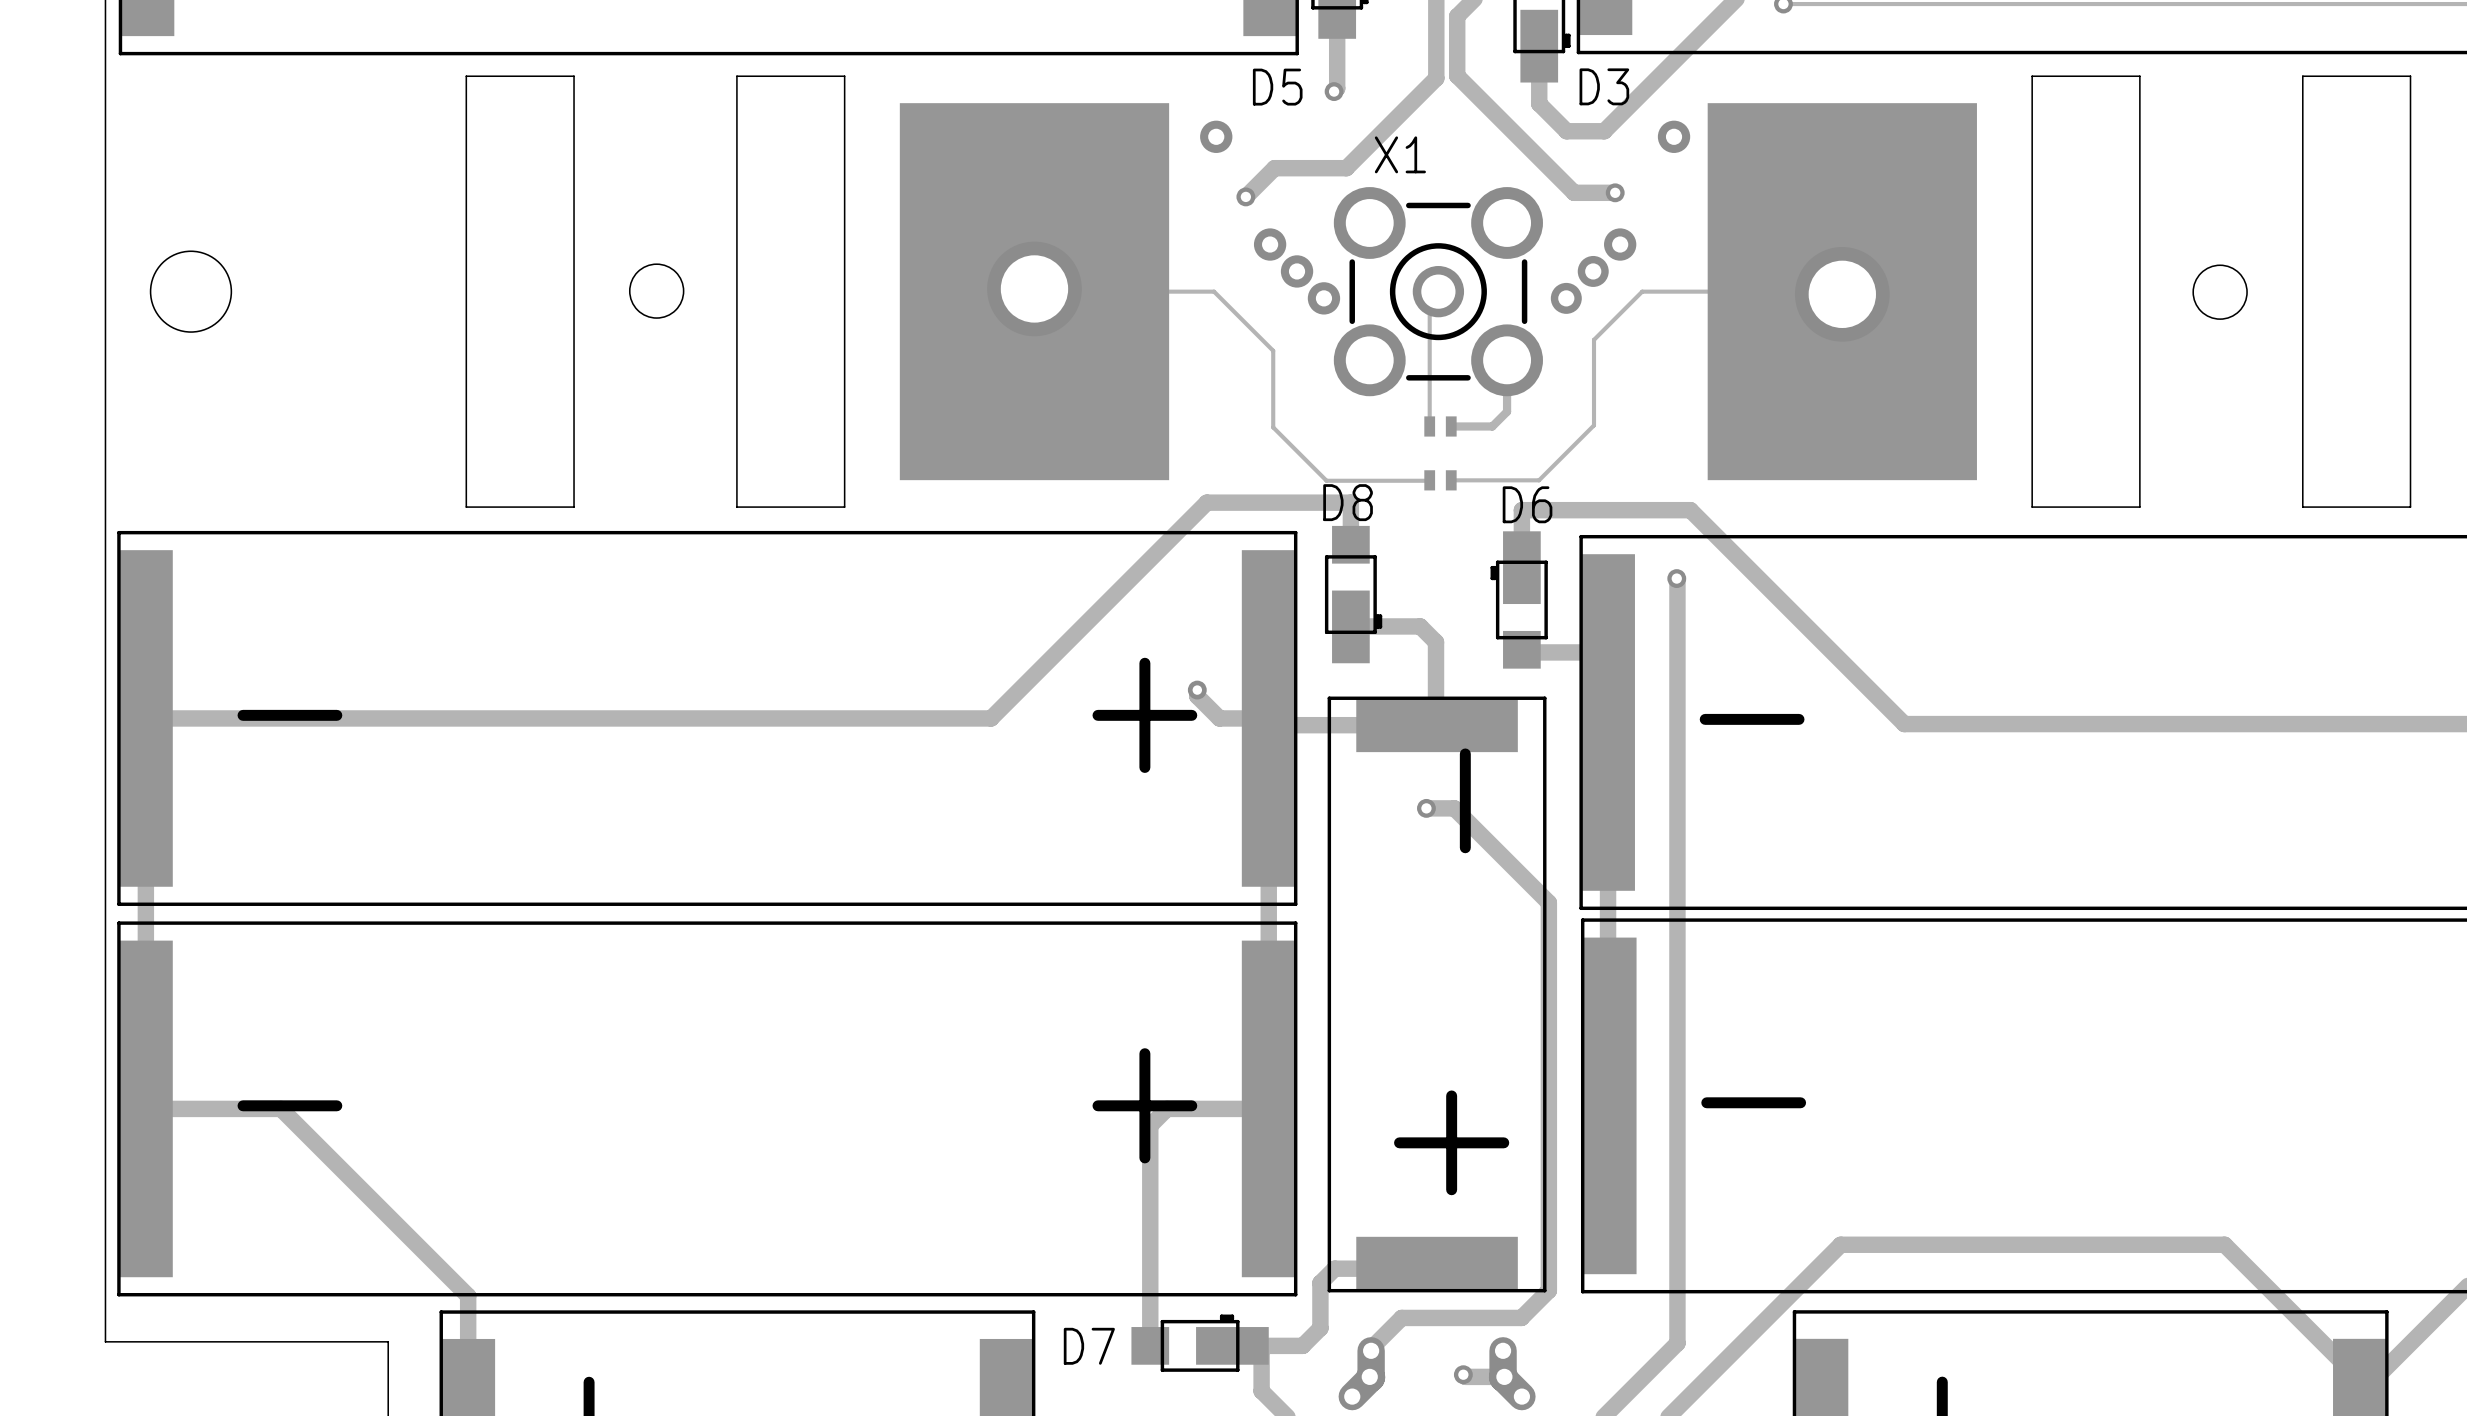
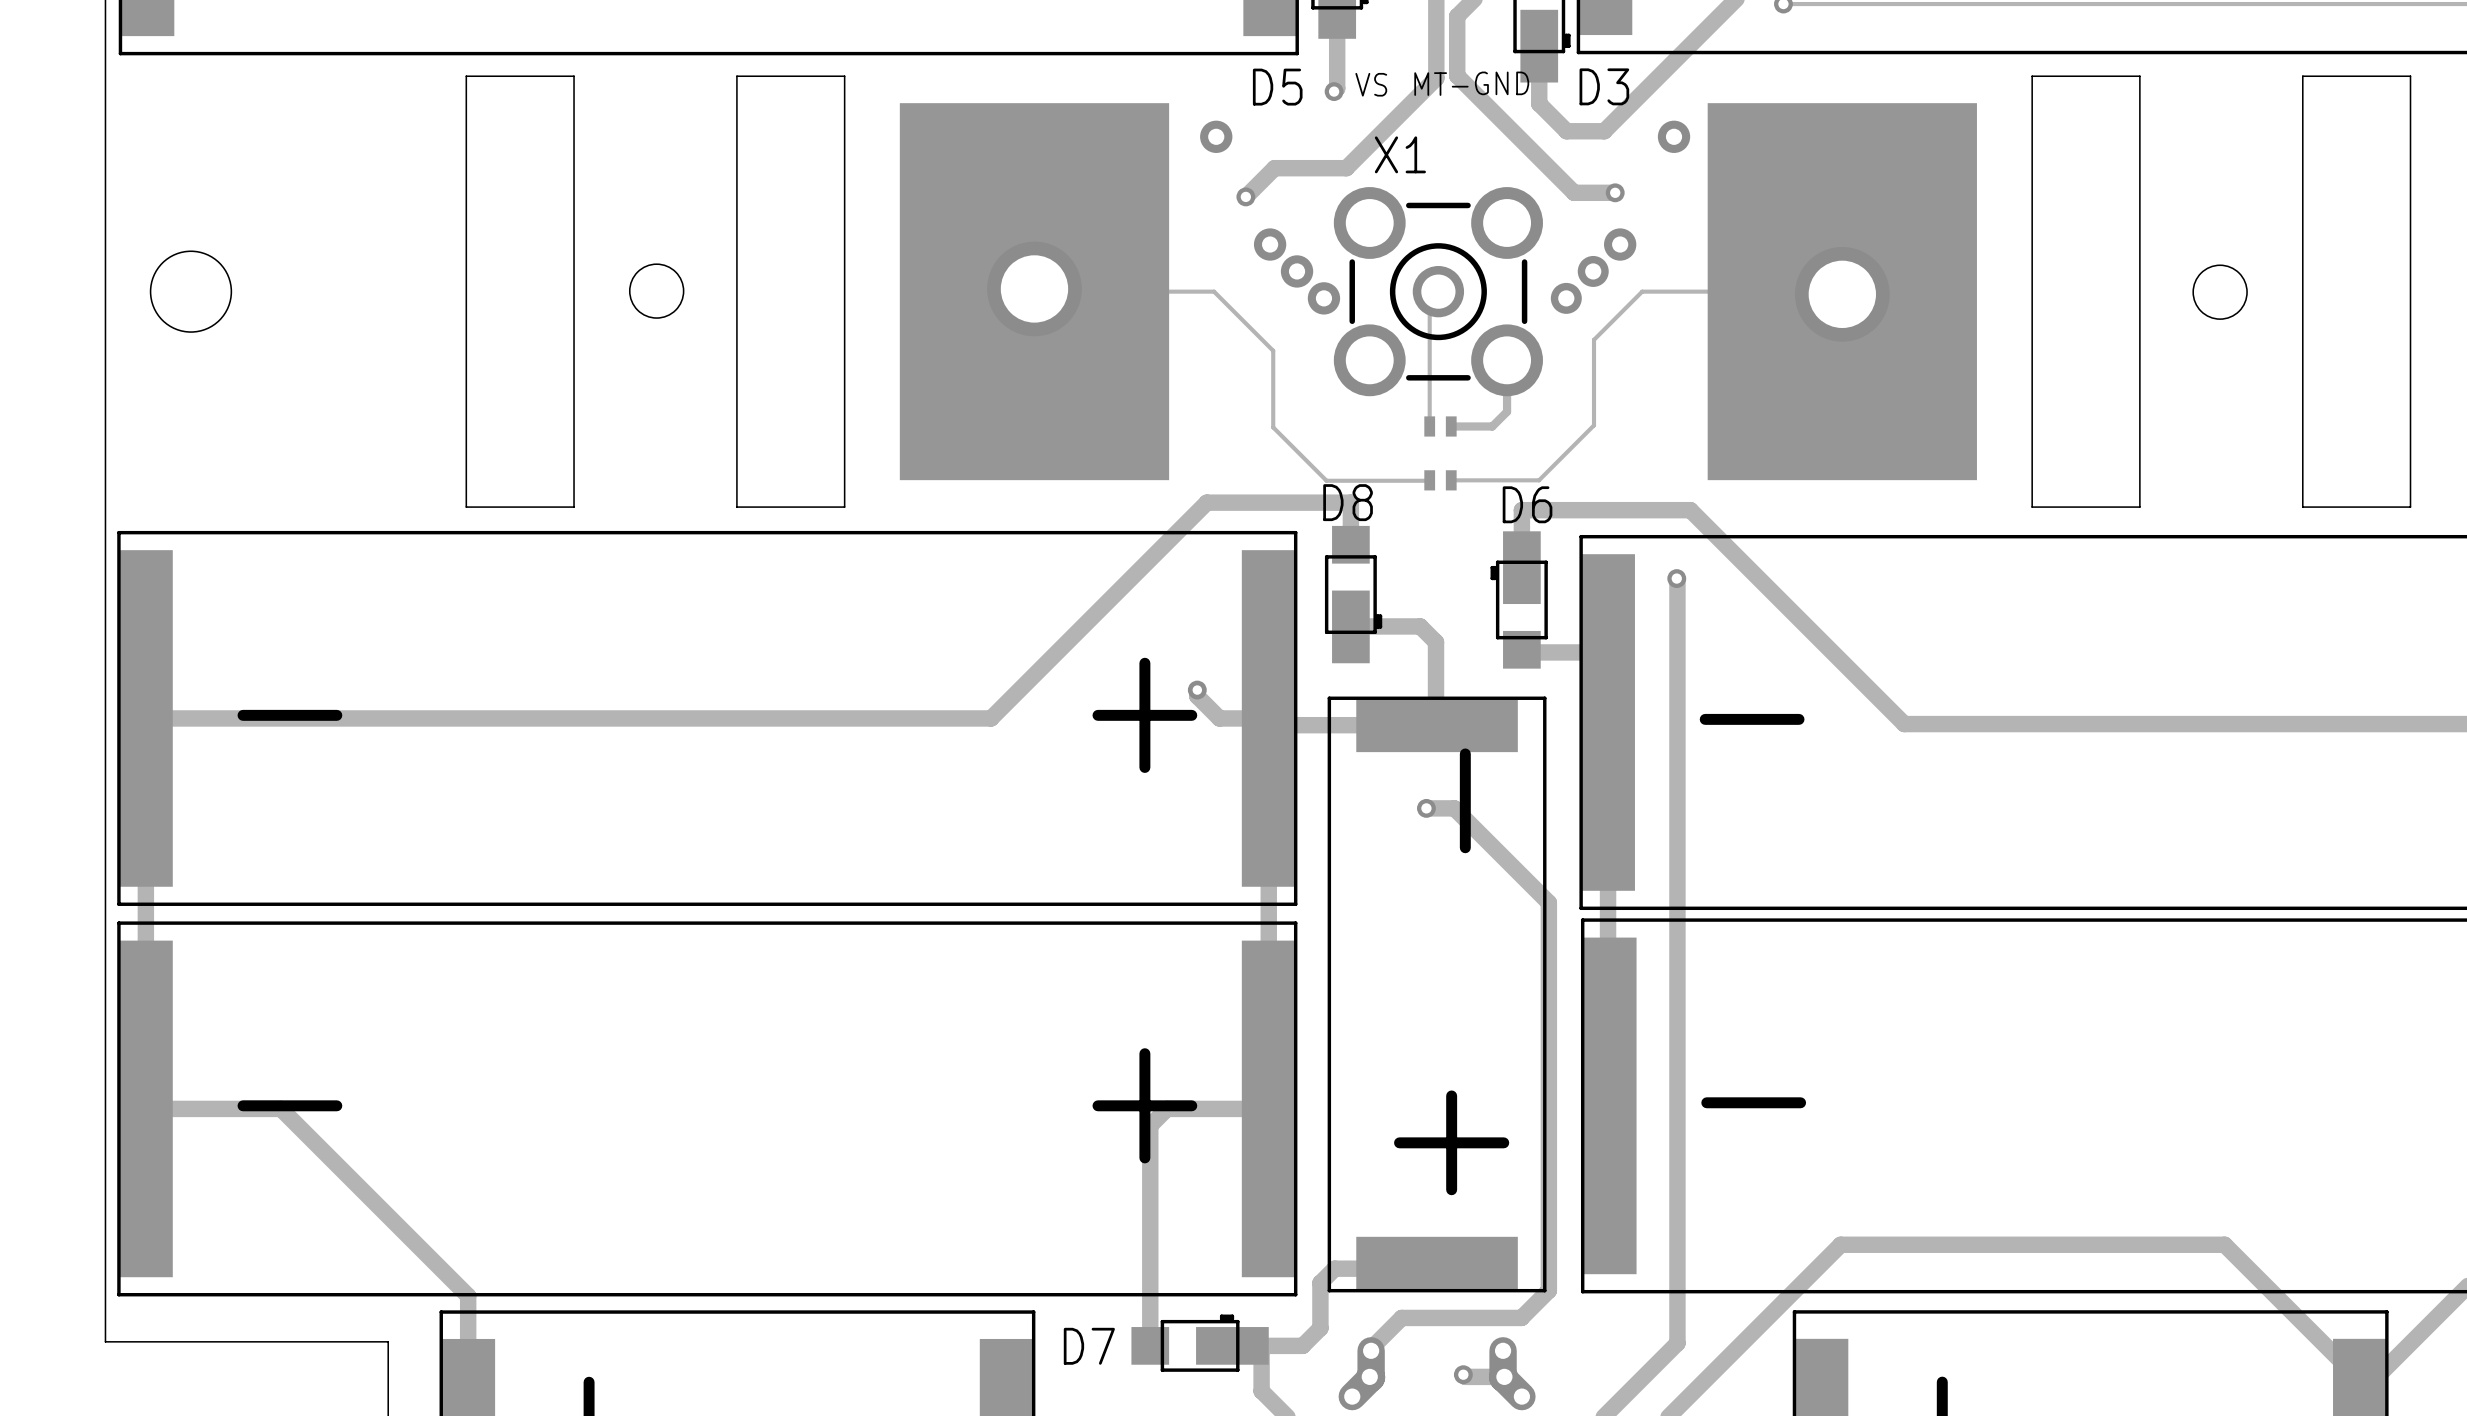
text: none -> GND (1502, 83)
text: none -> VS (1371, 84)
text: none -> MT- (1441, 84)

